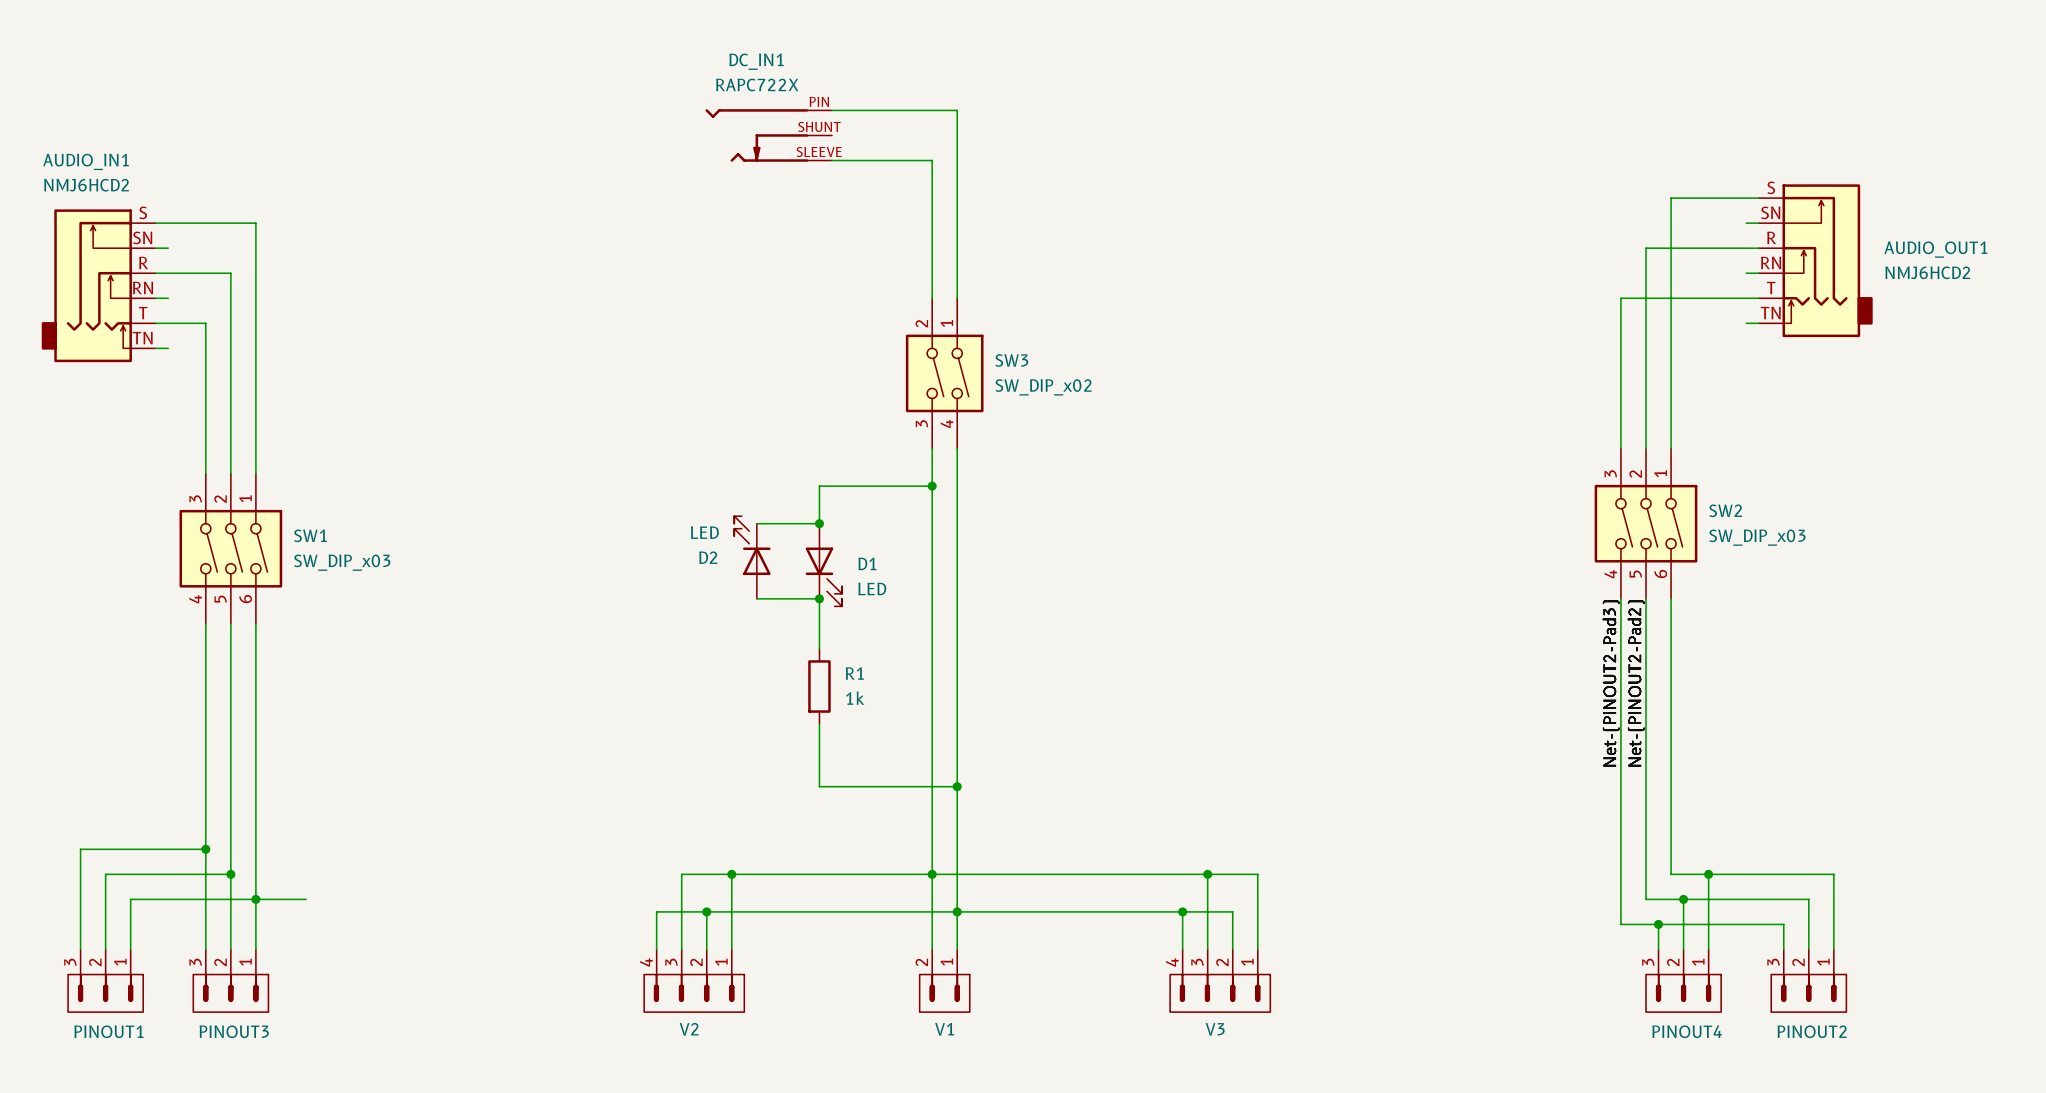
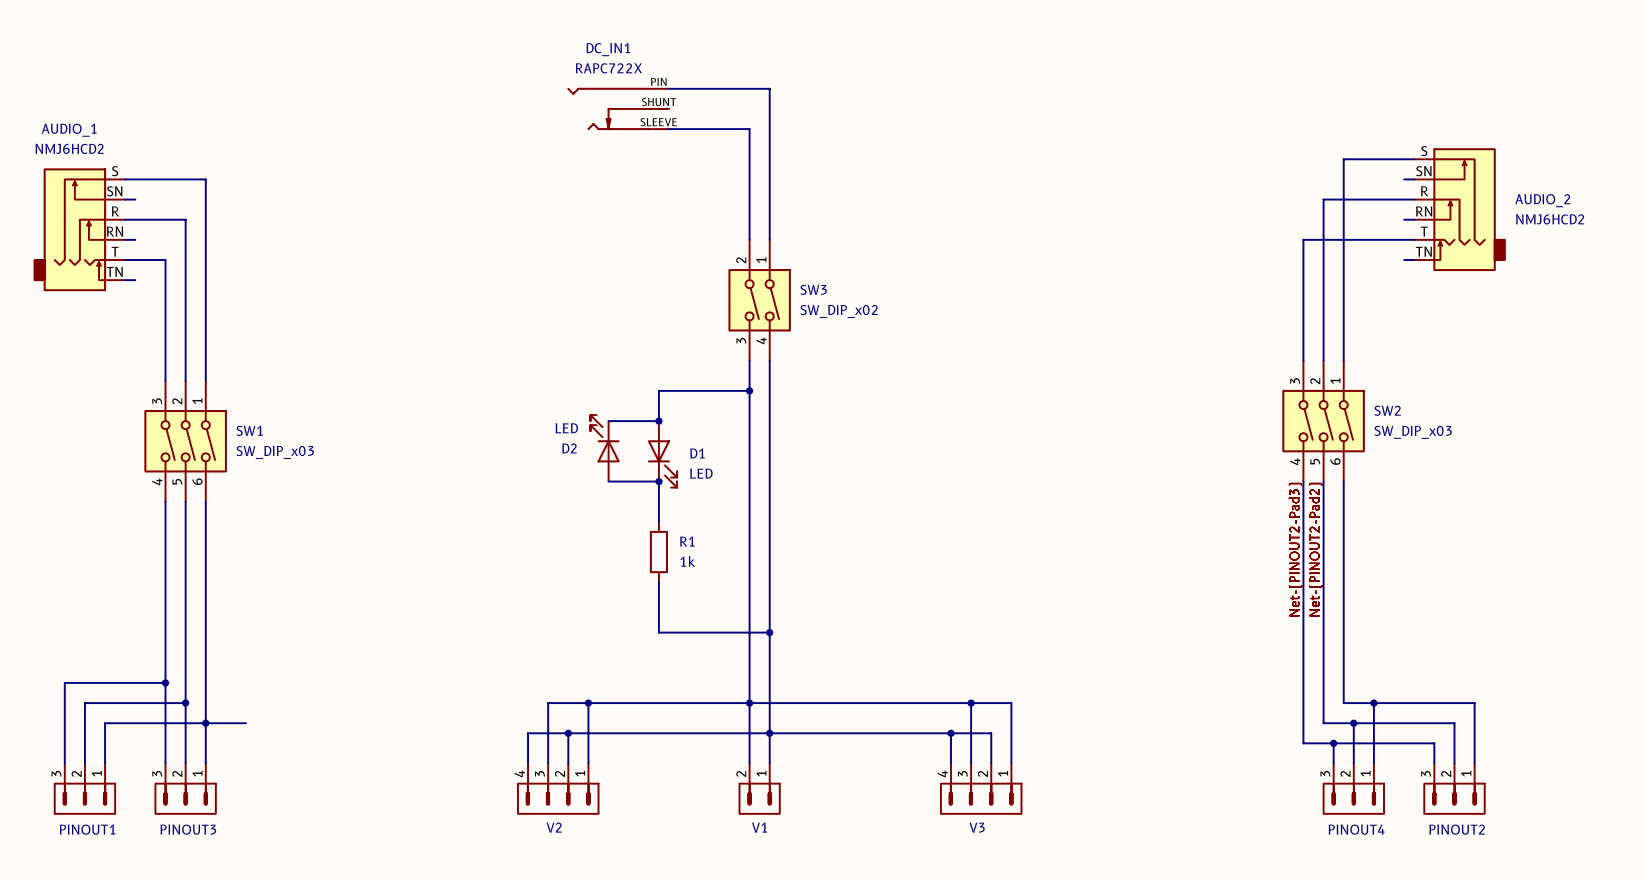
AUDIO_IN1 name: AUDIO_IN1 (86, 161) -> AUDIO_1 (69, 130)
AUDIO_OUT1 name: AUDIO_OUT1 (1935, 249) -> AUDIO_2 (1542, 200)

